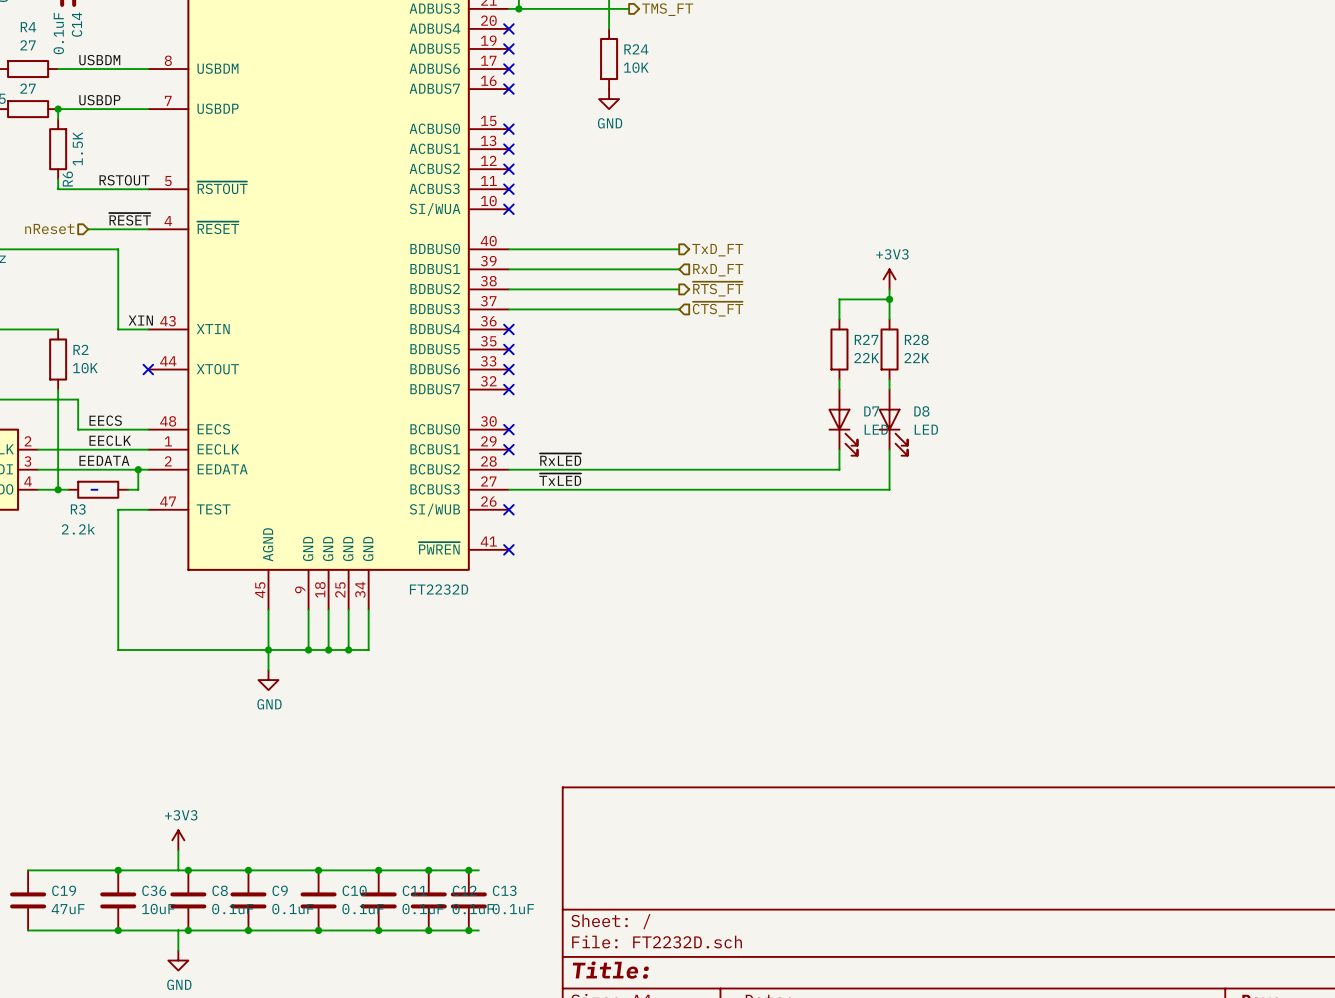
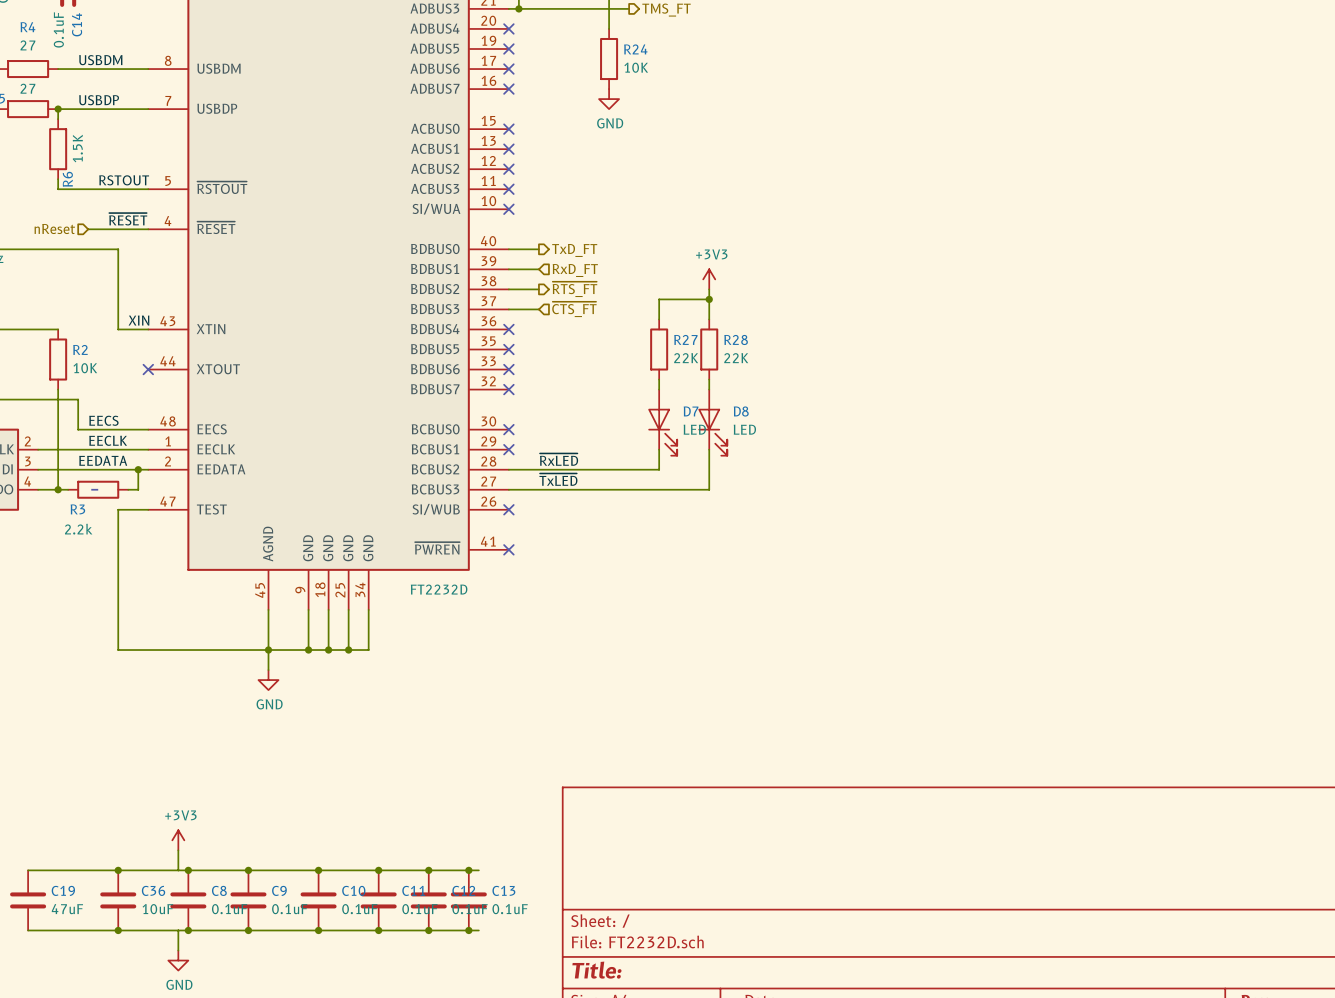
wire: (538, 249) (679, 249) -> none
hierarchical label position: TxD_FT (717, 250) -> TxD_FT (574, 250)
wire: (538, 269) (679, 269) -> none
hierarchical label position: RxD_FT (718, 270) -> RxD_FT (575, 270)
power symbol position: +3V3 (889, 279) -> +3V3 (709, 279)
wire: (538, 289) (679, 289) -> none
hierarchical label position: ~{RTS_FT} (718, 289) -> ~{RTS_FT} (574, 289)
wire: (889, 289) (889, 319) -> (709, 289) (709, 319)
junction: none -> (709, 299)
wire: (889, 299) (839, 299) (839, 319) -> (709, 299) (659, 299) (659, 319)
junction: (889, 299) -> none
wire: (538, 309) (679, 309) -> none
hierarchical label position: ~{CTS_FT} (718, 309) -> ~{CTS_FT} (574, 309)
R27 position: (839, 349) -> (659, 349)
R28 position: (889, 349) -> (709, 349)
wire: (839, 379) (839, 389) -> (659, 379) (659, 389)
wire: (889, 379) (889, 389) -> (709, 379) (709, 389)
D7 position: (843, 422) -> (662, 422)
D8 position: (893, 422) -> (712, 422)
wire: (839, 449) (839, 469) (659, 469) -> (659, 449) (659, 469)
wire: (889, 449) (889, 489) (709, 489) -> (709, 449) (709, 489)

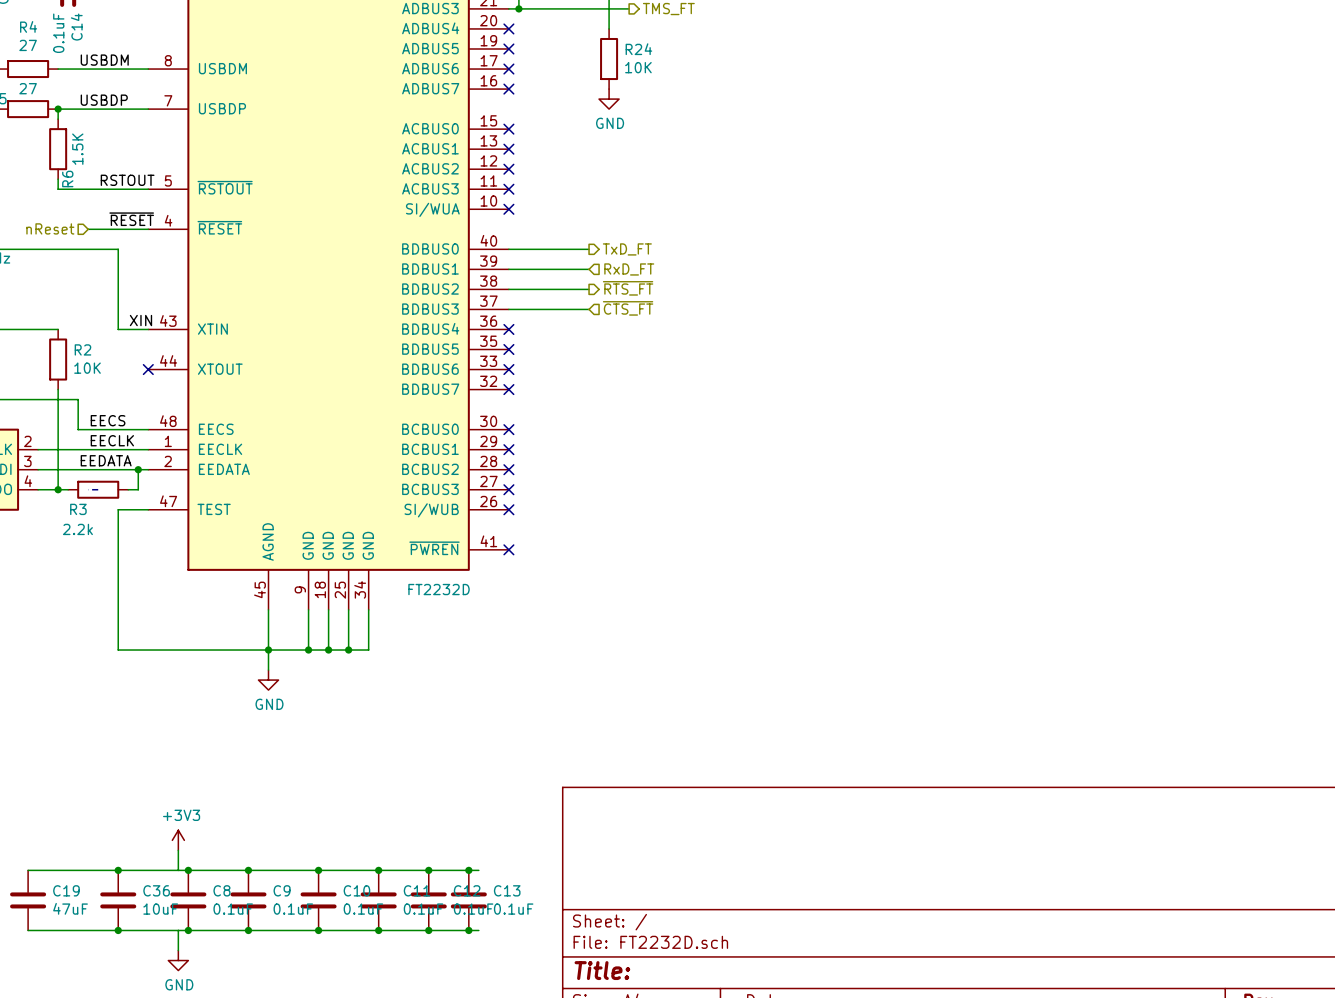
wire: none -> (538, 249) (589, 249)
hierarchical label position: TxD_FT (574, 250) -> TxD_FT (627, 249)
wire: none -> (538, 269) (589, 269)
hierarchical label position: RxD_FT (575, 270) -> RxD_FT (629, 269)
power symbol: +3V3 (709, 279) -> none
wire: none -> (538, 289) (589, 289)
hierarchical label position: ~{RTS_FT} (574, 289) -> ~{RTS_FT} (628, 288)
wire: (709, 289) (709, 319) -> none
wire: (709, 299) (659, 299) (659, 319) -> none
junction: (709, 299) -> none
wire: none -> (538, 309) (589, 309)
hierarchical label position: ~{CTS_FT} (574, 309) -> ~{CTS_FT} (628, 308)
R27: 22K (659, 349) -> none
R28: 22K (709, 349) -> none
wire: (659, 379) (659, 389) -> none
wire: (709, 379) (709, 389) -> none
D7: LED (662, 422) -> none
D8: LED (712, 422) -> none
wire: (659, 449) (659, 469) (508, 469) -> none
wire: (709, 449) (709, 489) (508, 489) -> none
label: ~{RxLED} (559, 459) -> none
no-connect mark: none -> (508, 469)
label: ~{TxLED} (558, 479) -> none
no-connect mark: none -> (508, 489)

